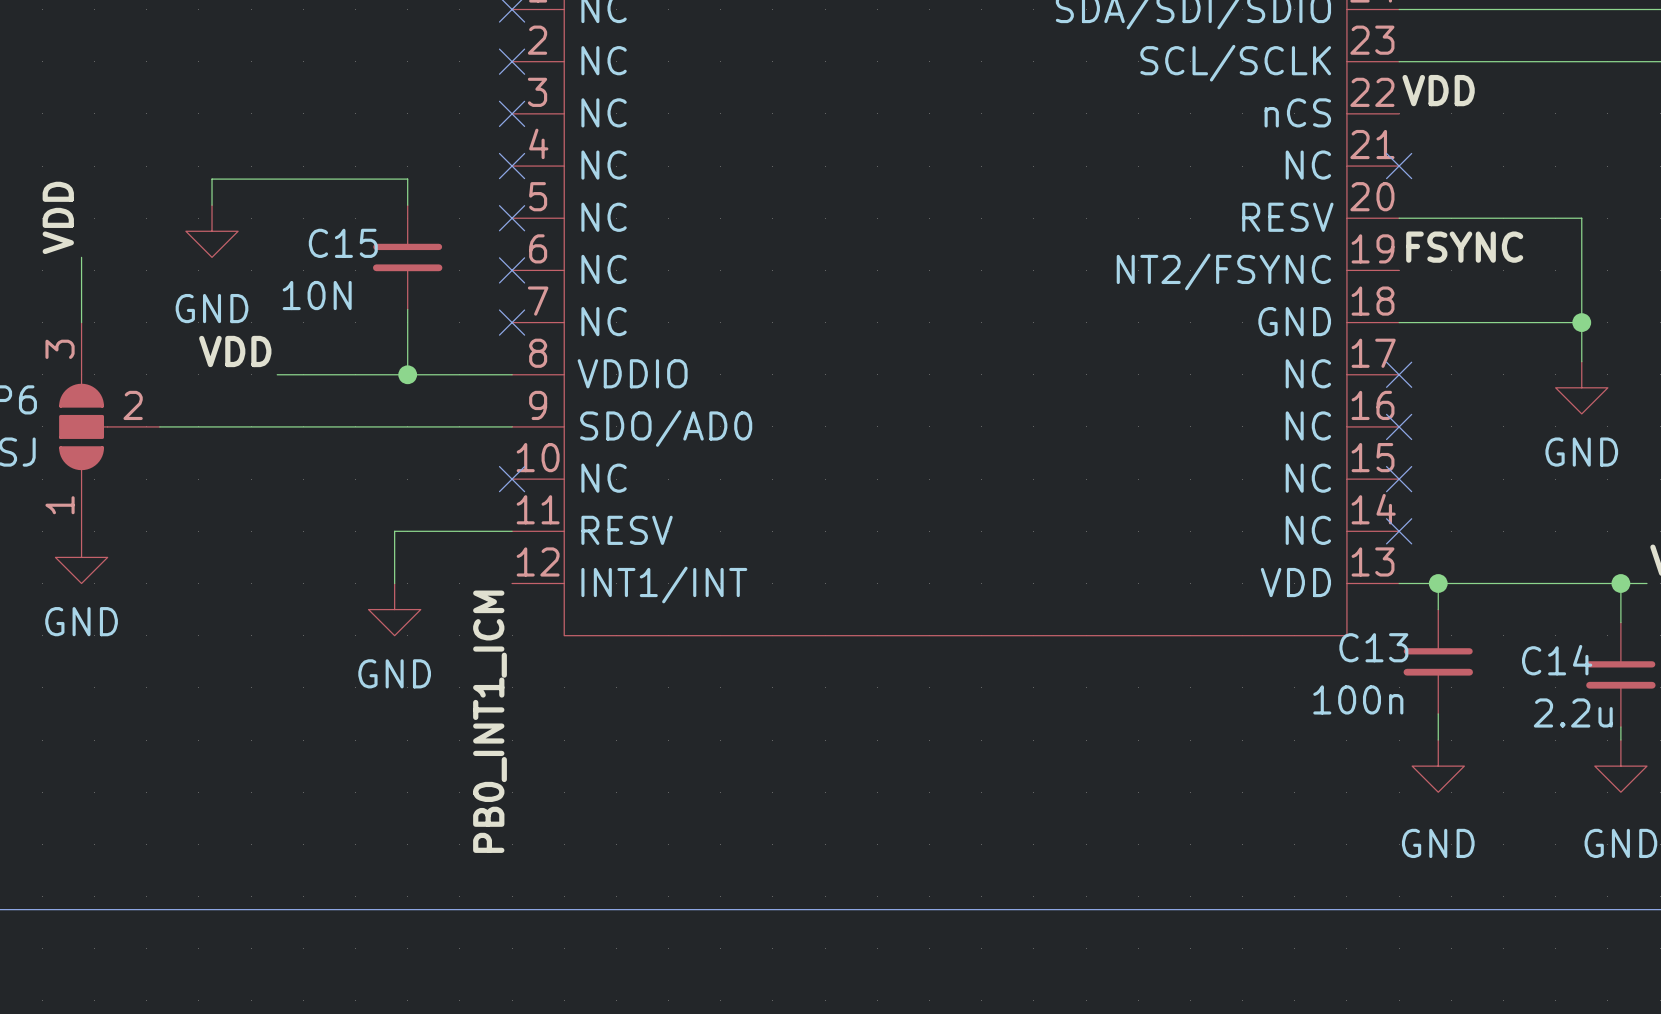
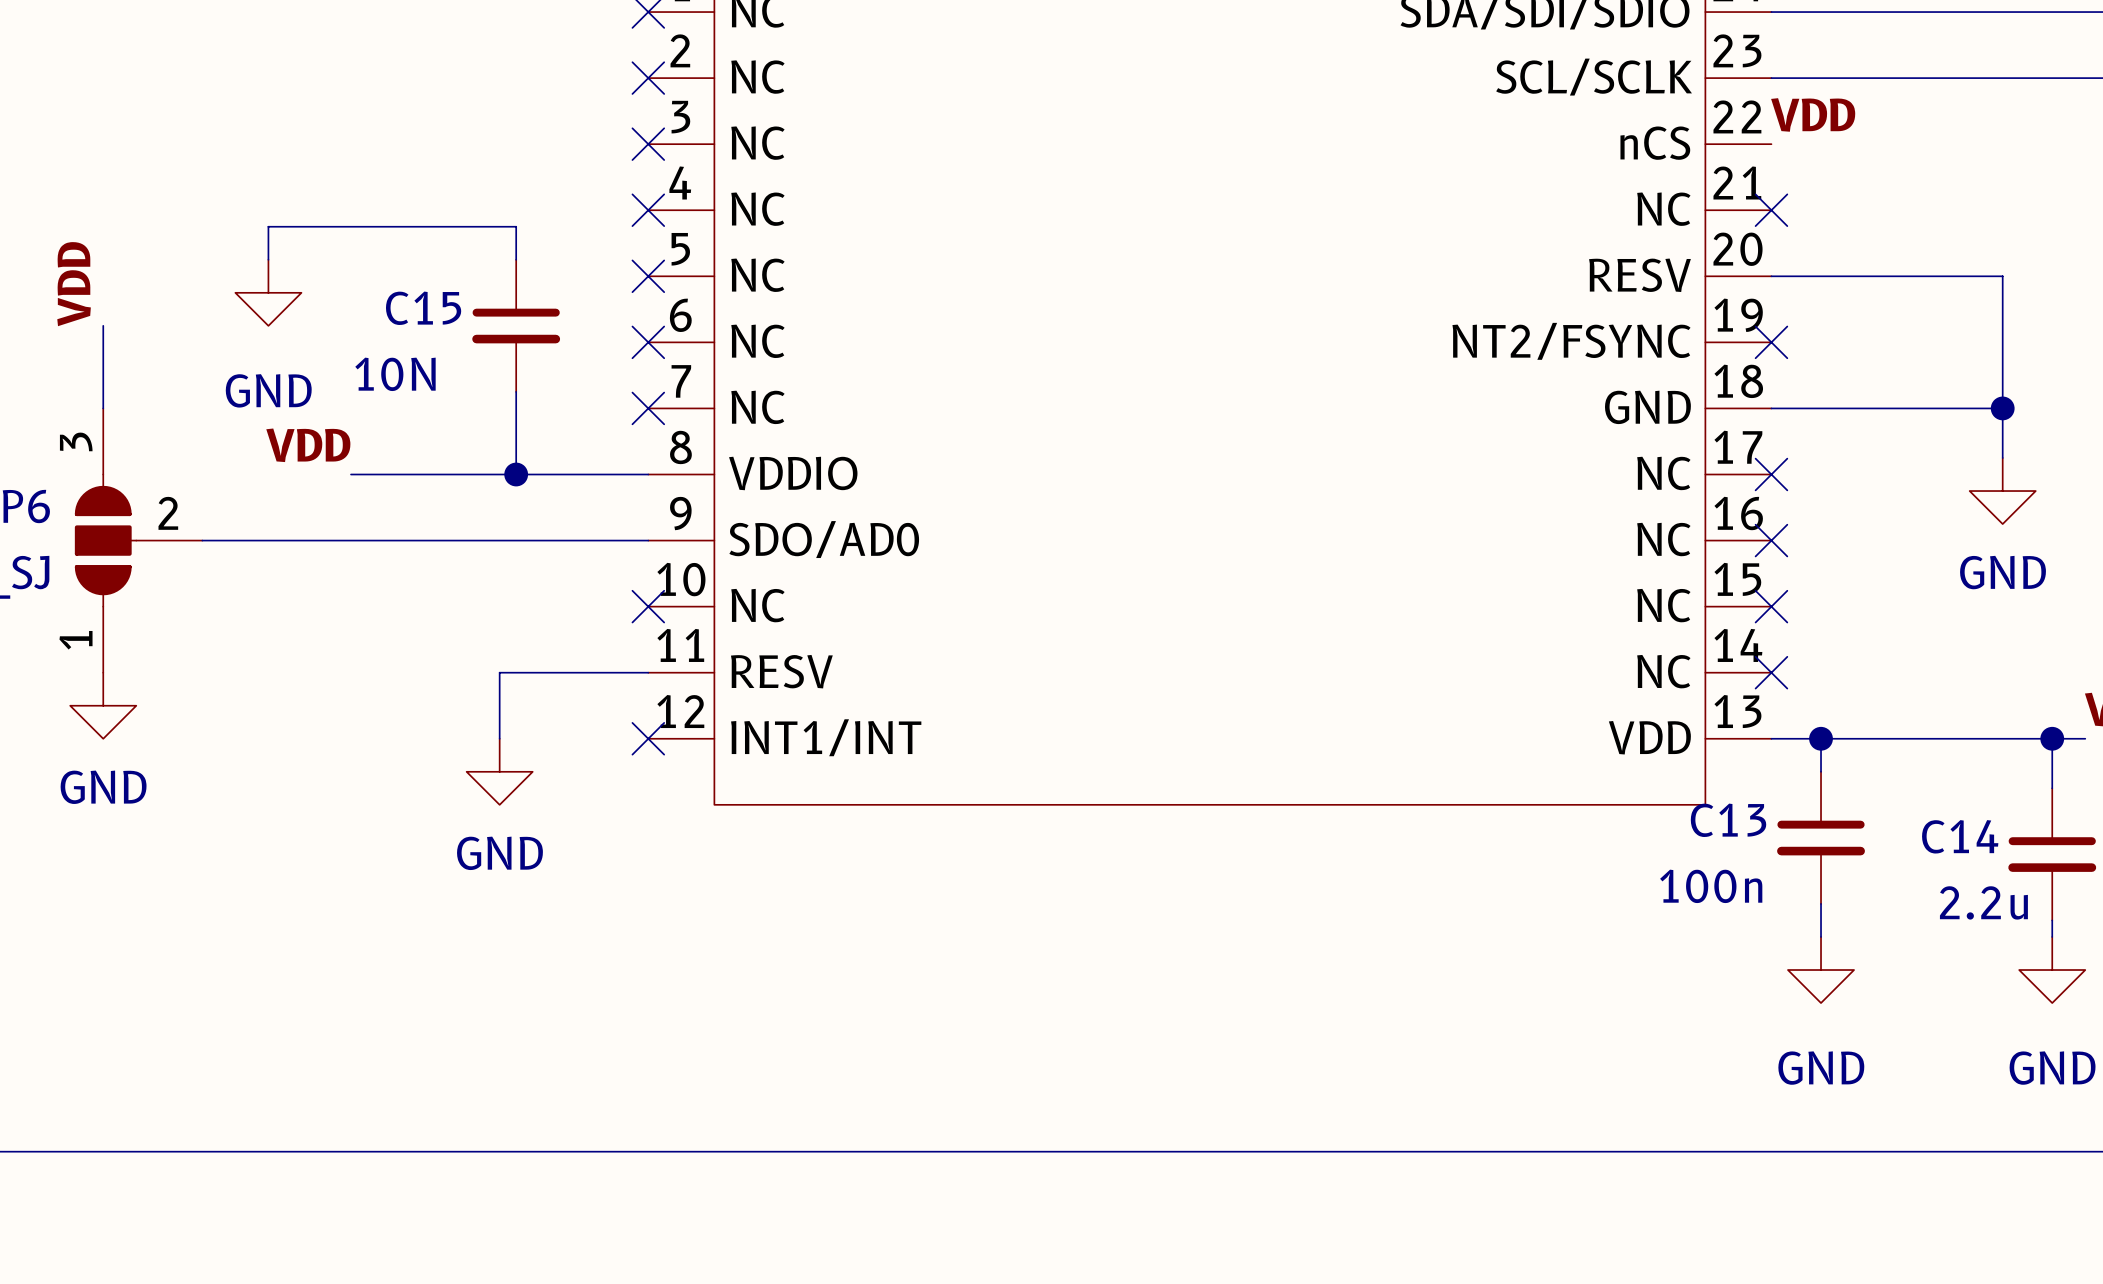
label: FSYNC (1464, 247) -> none
no-connect mark: none -> (1771, 342)
no-connect mark: none -> (648, 738)
label: PB0_INT1_ICM (490, 721) -> none

